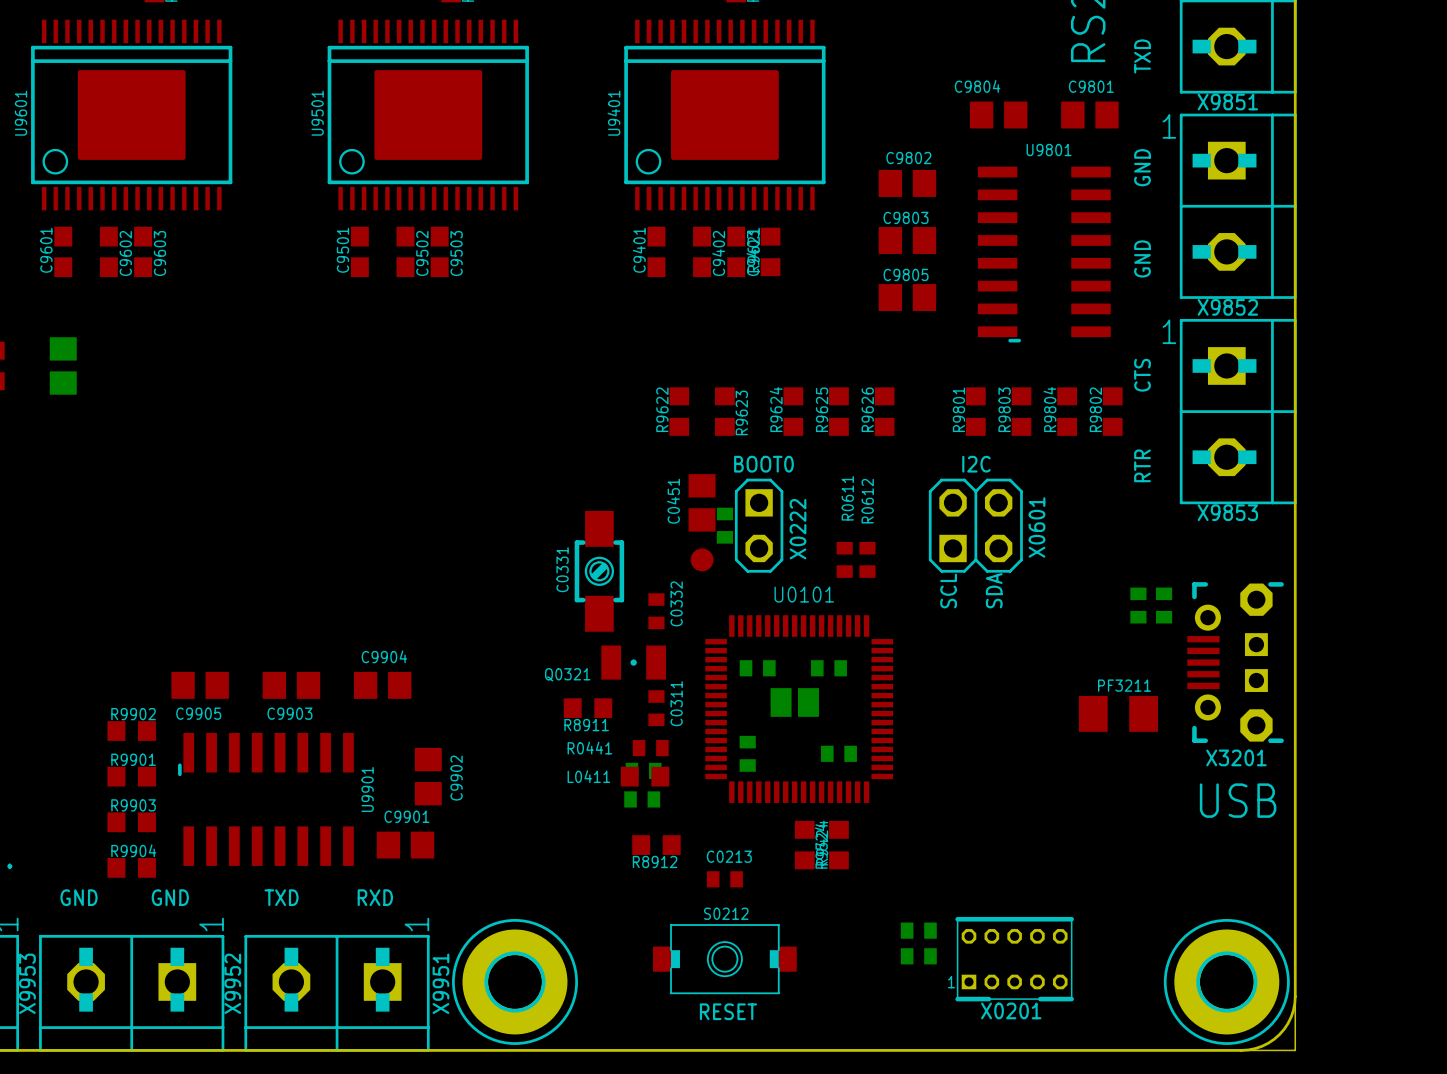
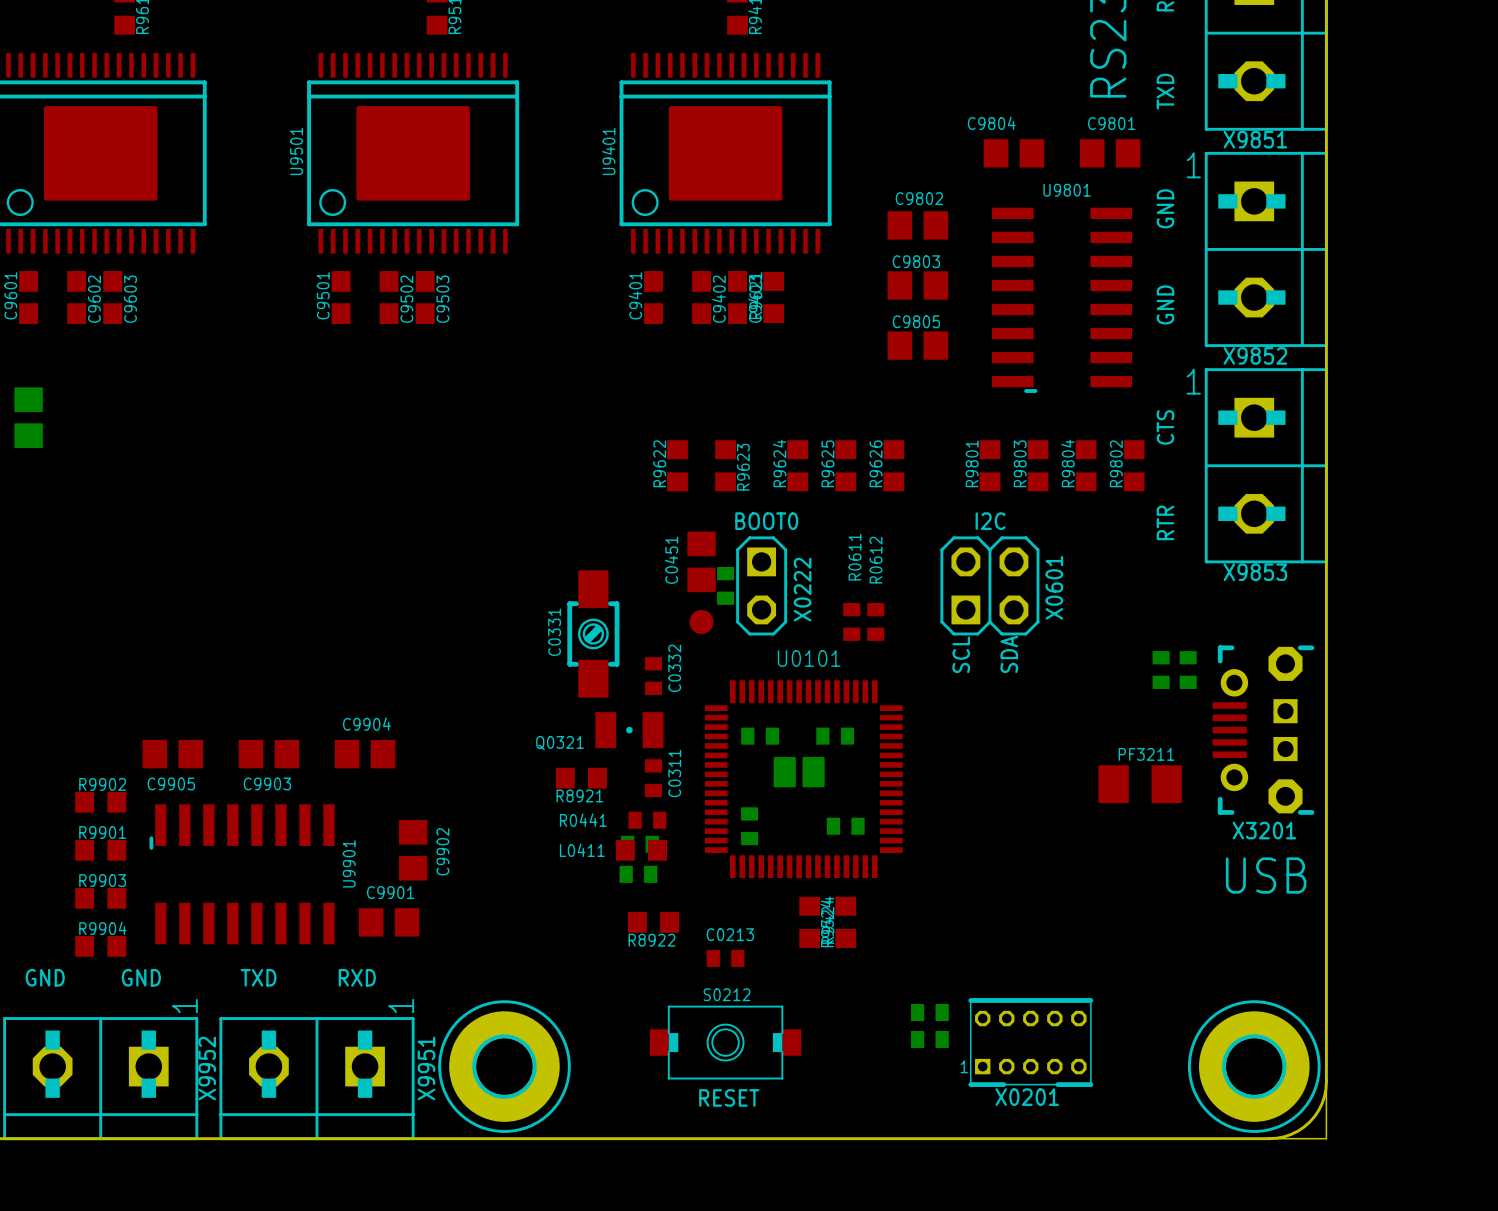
R8911 name: R8911 (586, 725) -> R8921 (579, 795)
R8912 name: R8912 (655, 861) -> R8922 (652, 940)

